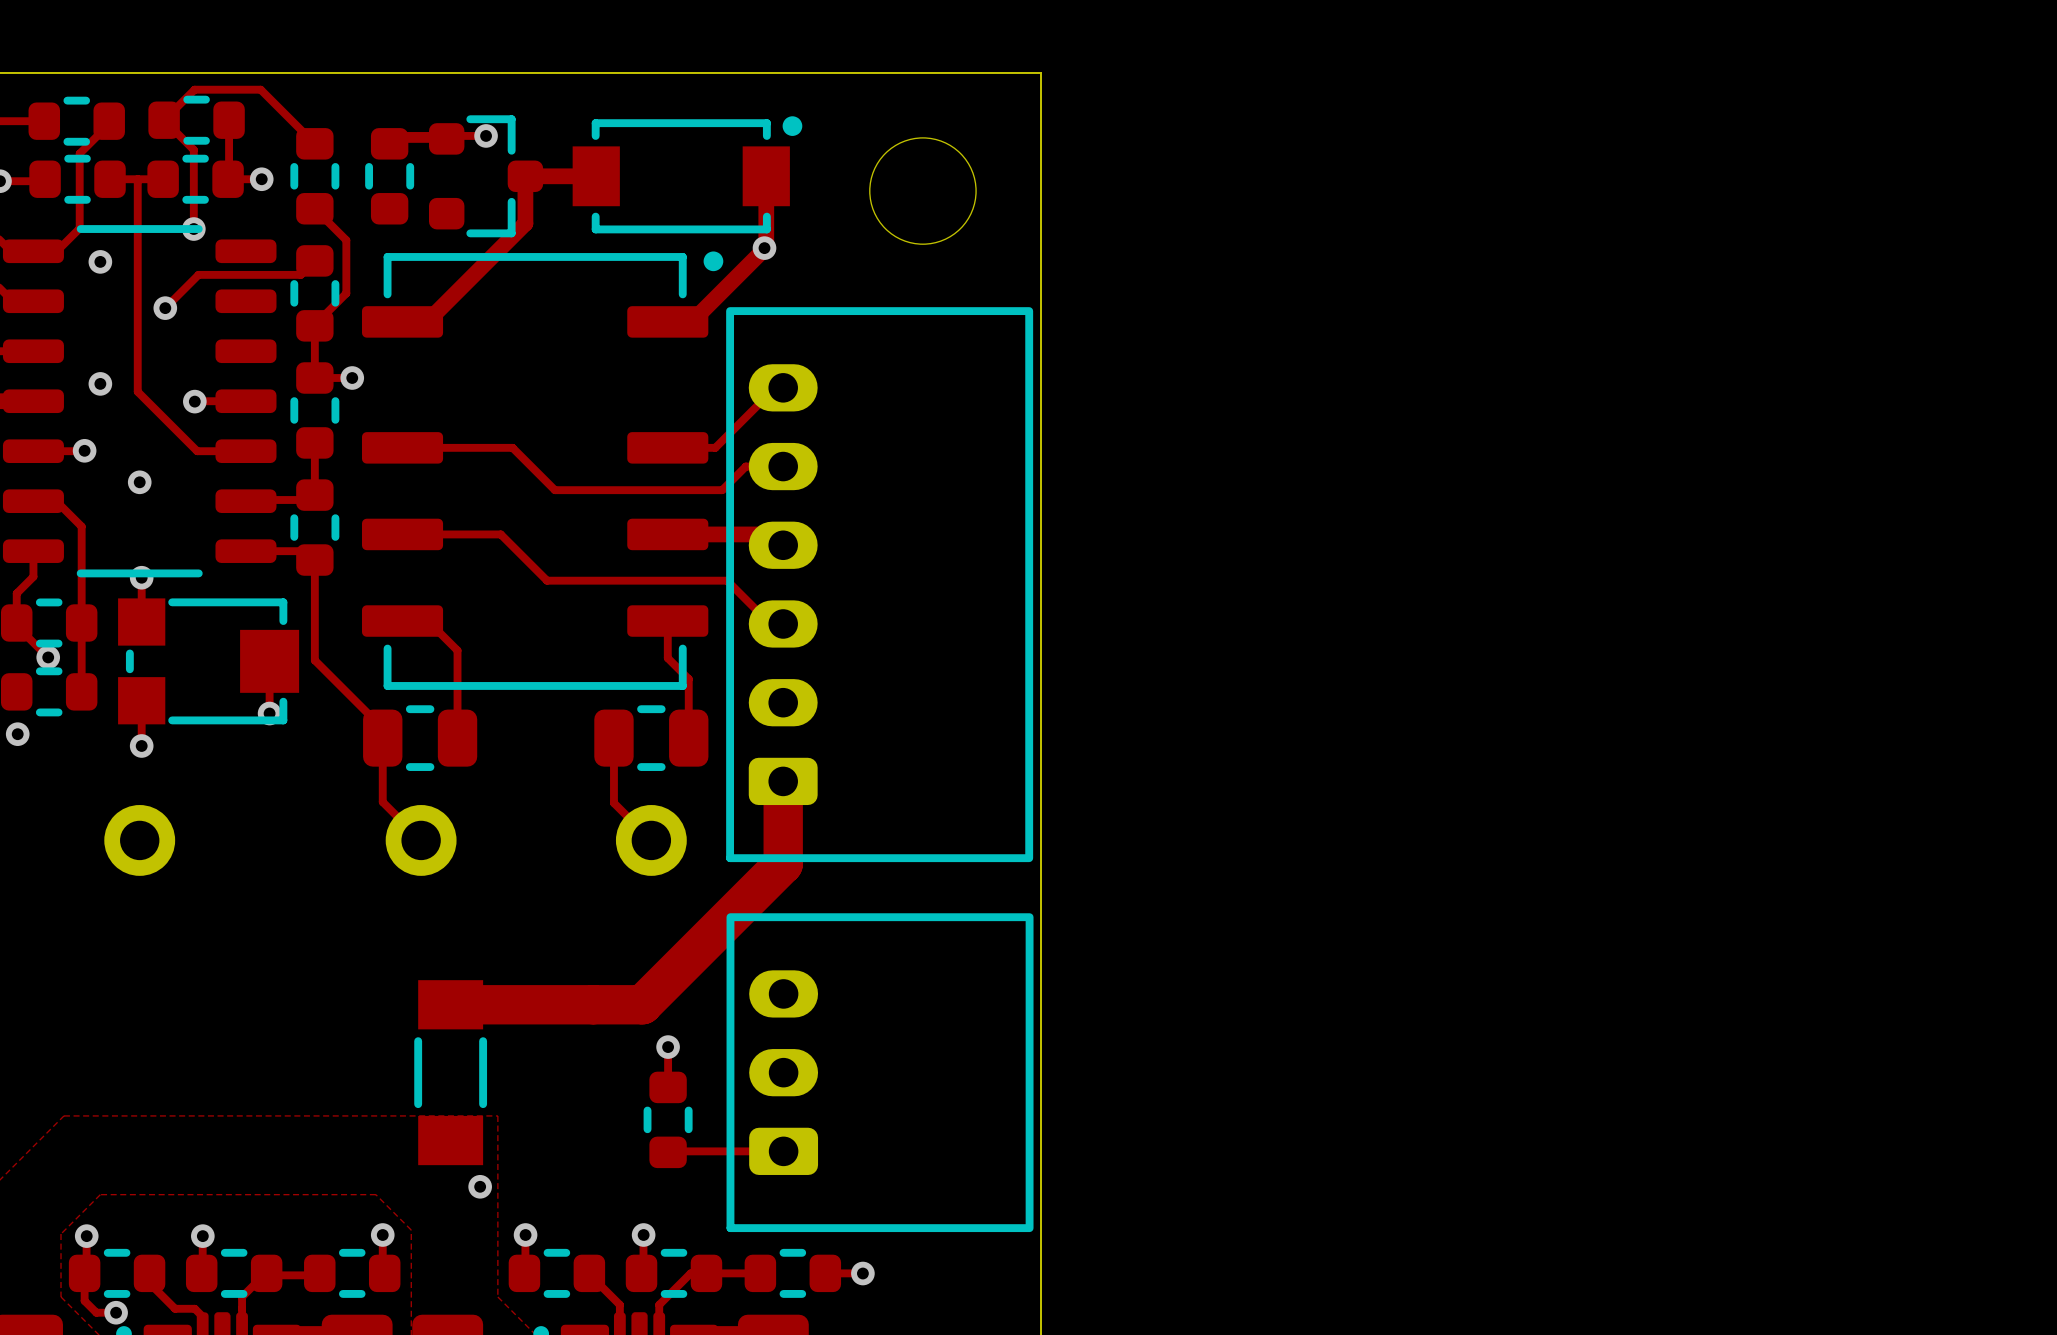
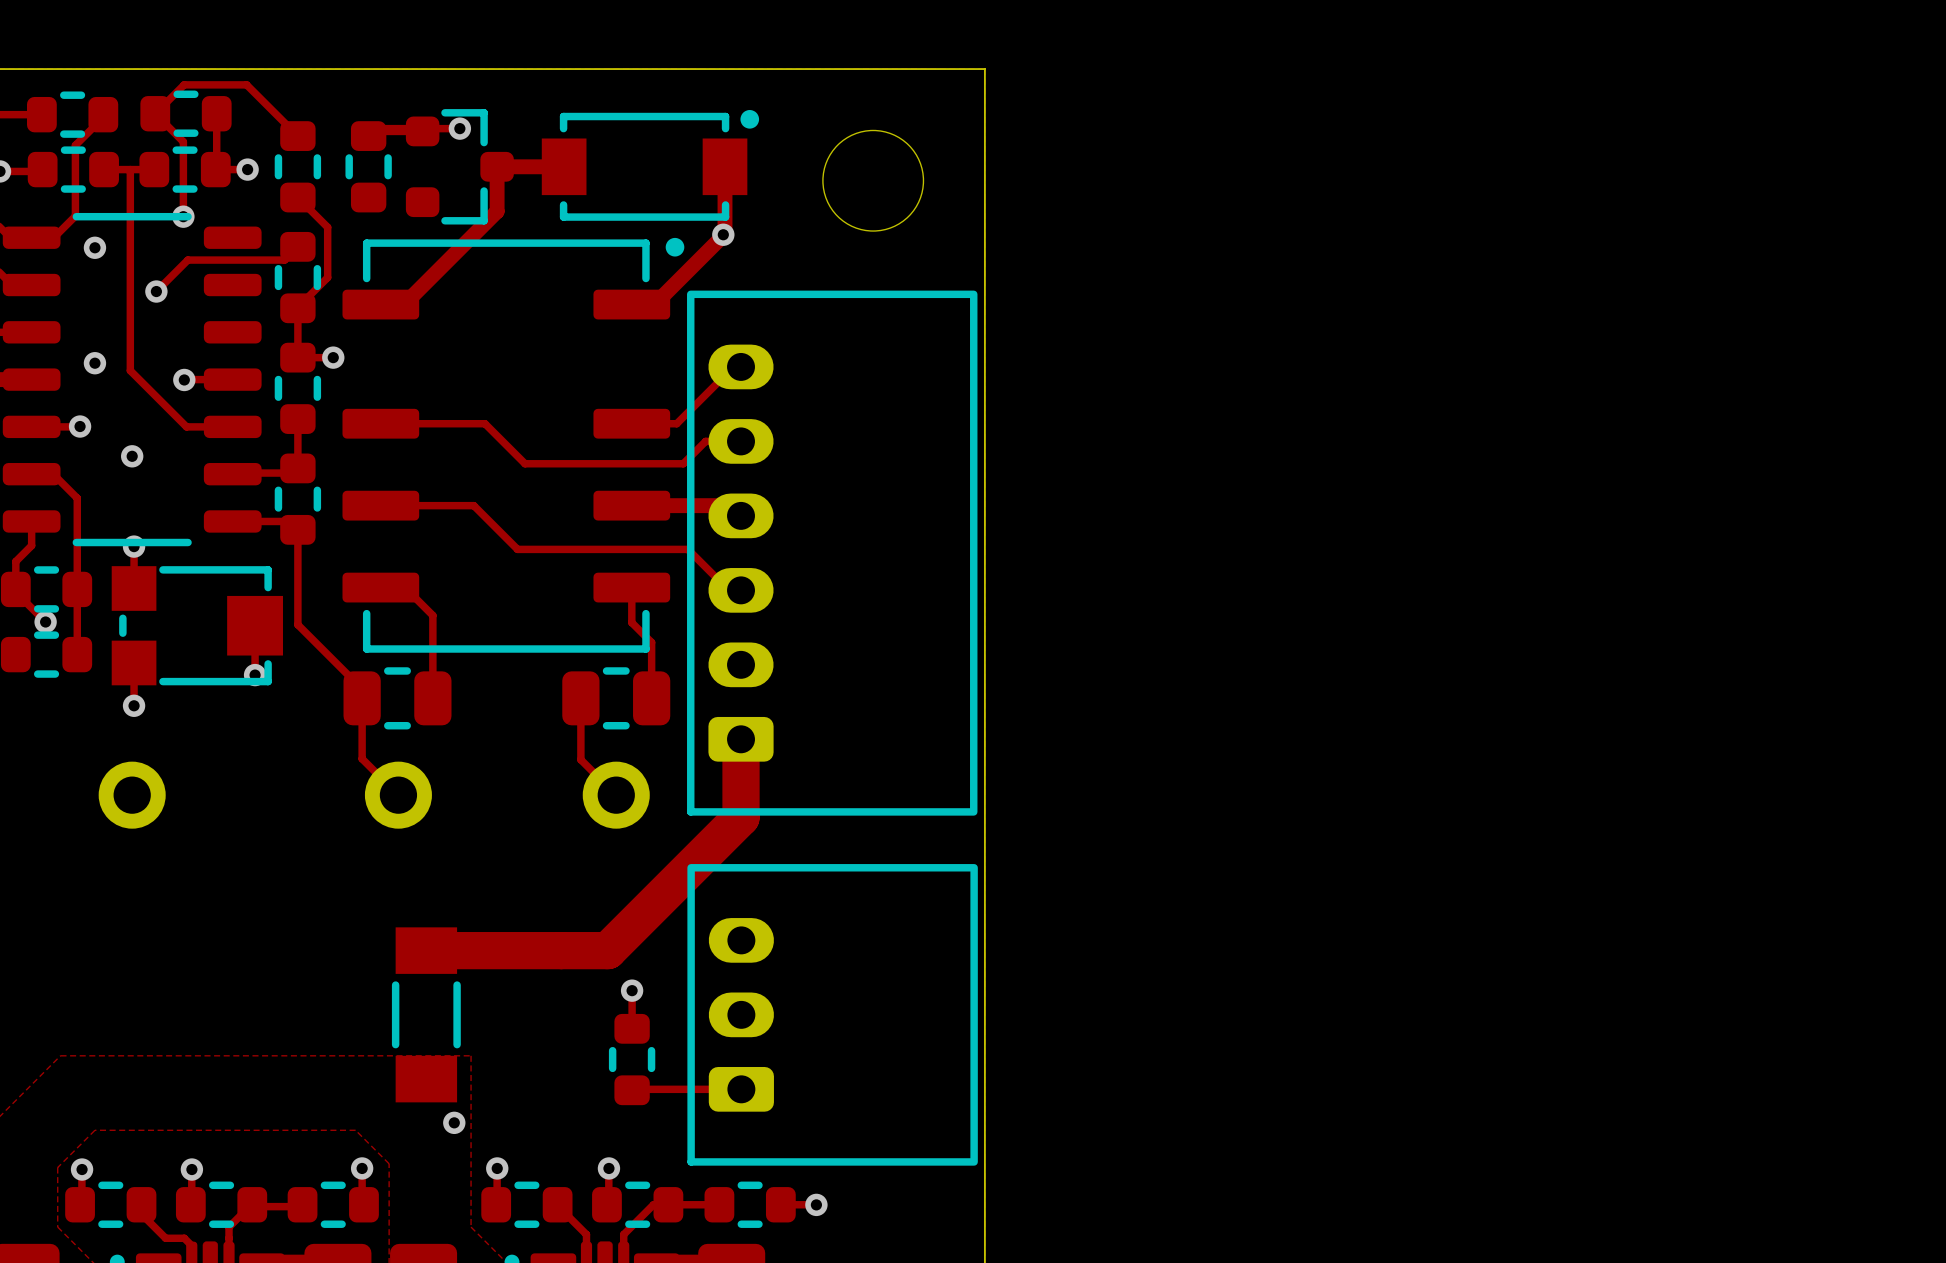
via: (17, 734) -> none
track: (84, 1273) (84, 1300) (96, 1312) (116, 1312) -> none
via: (116, 1312) -> none

